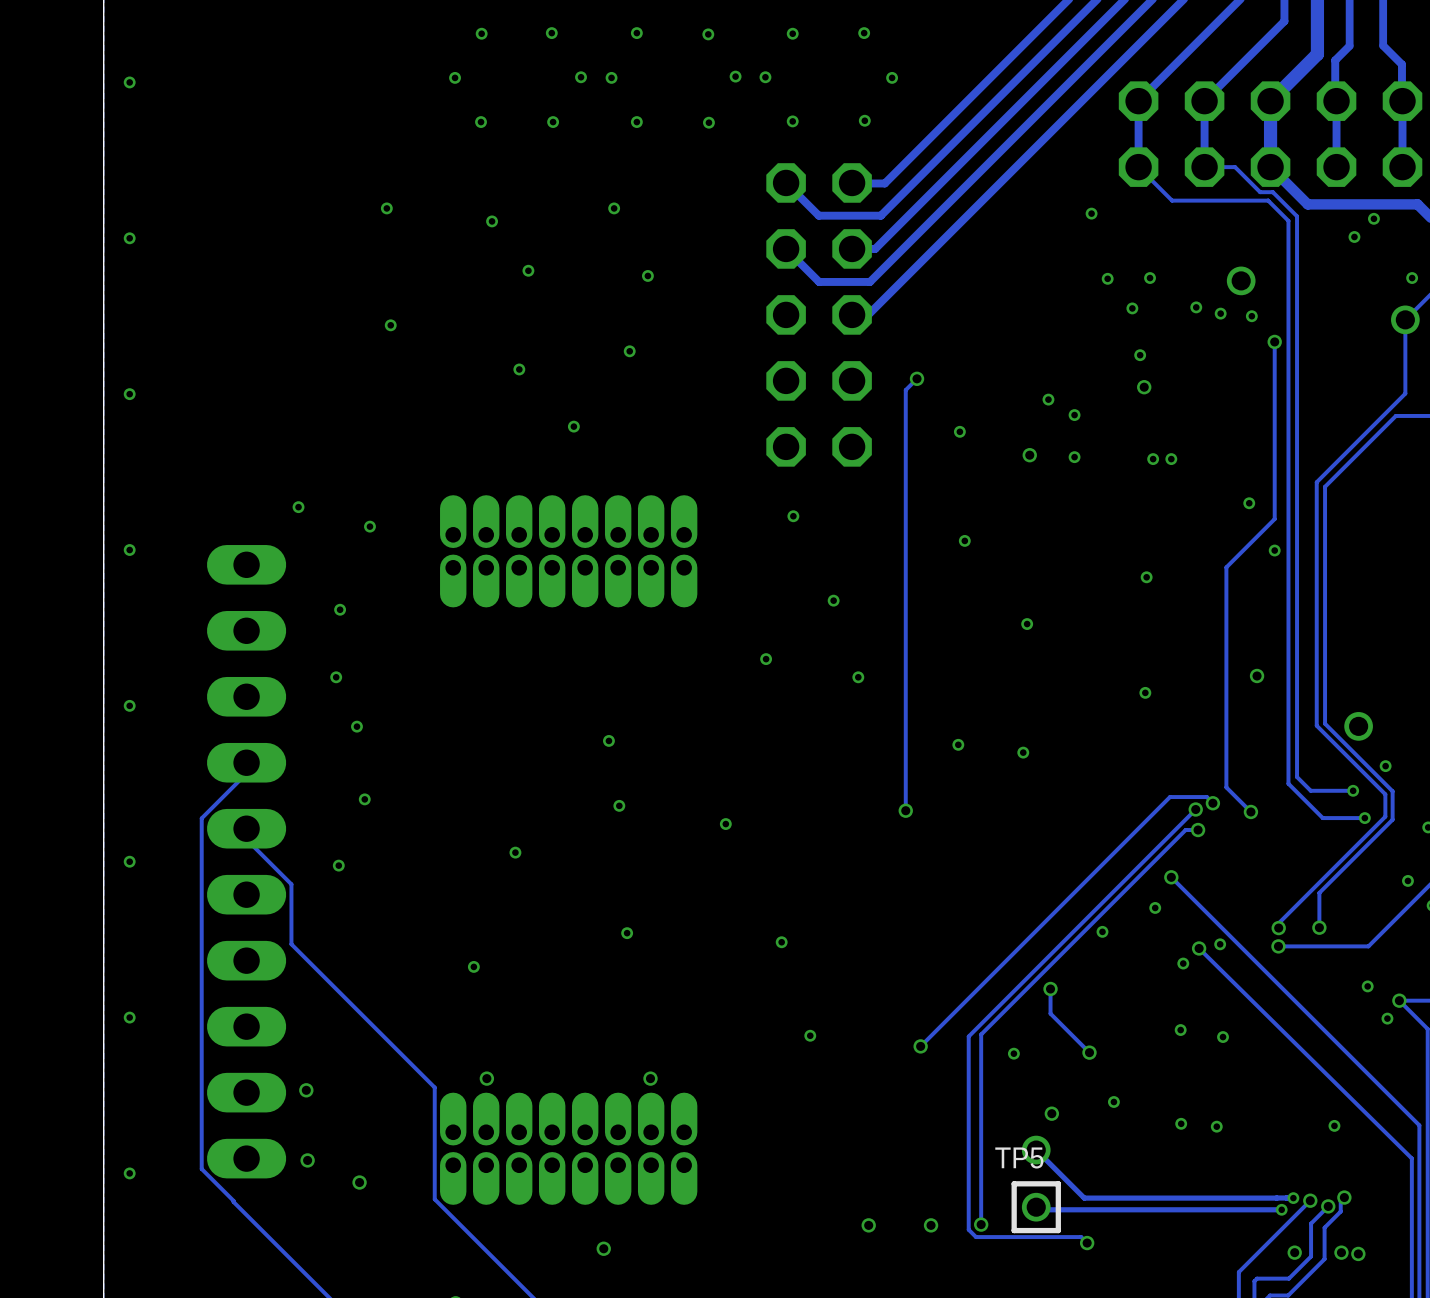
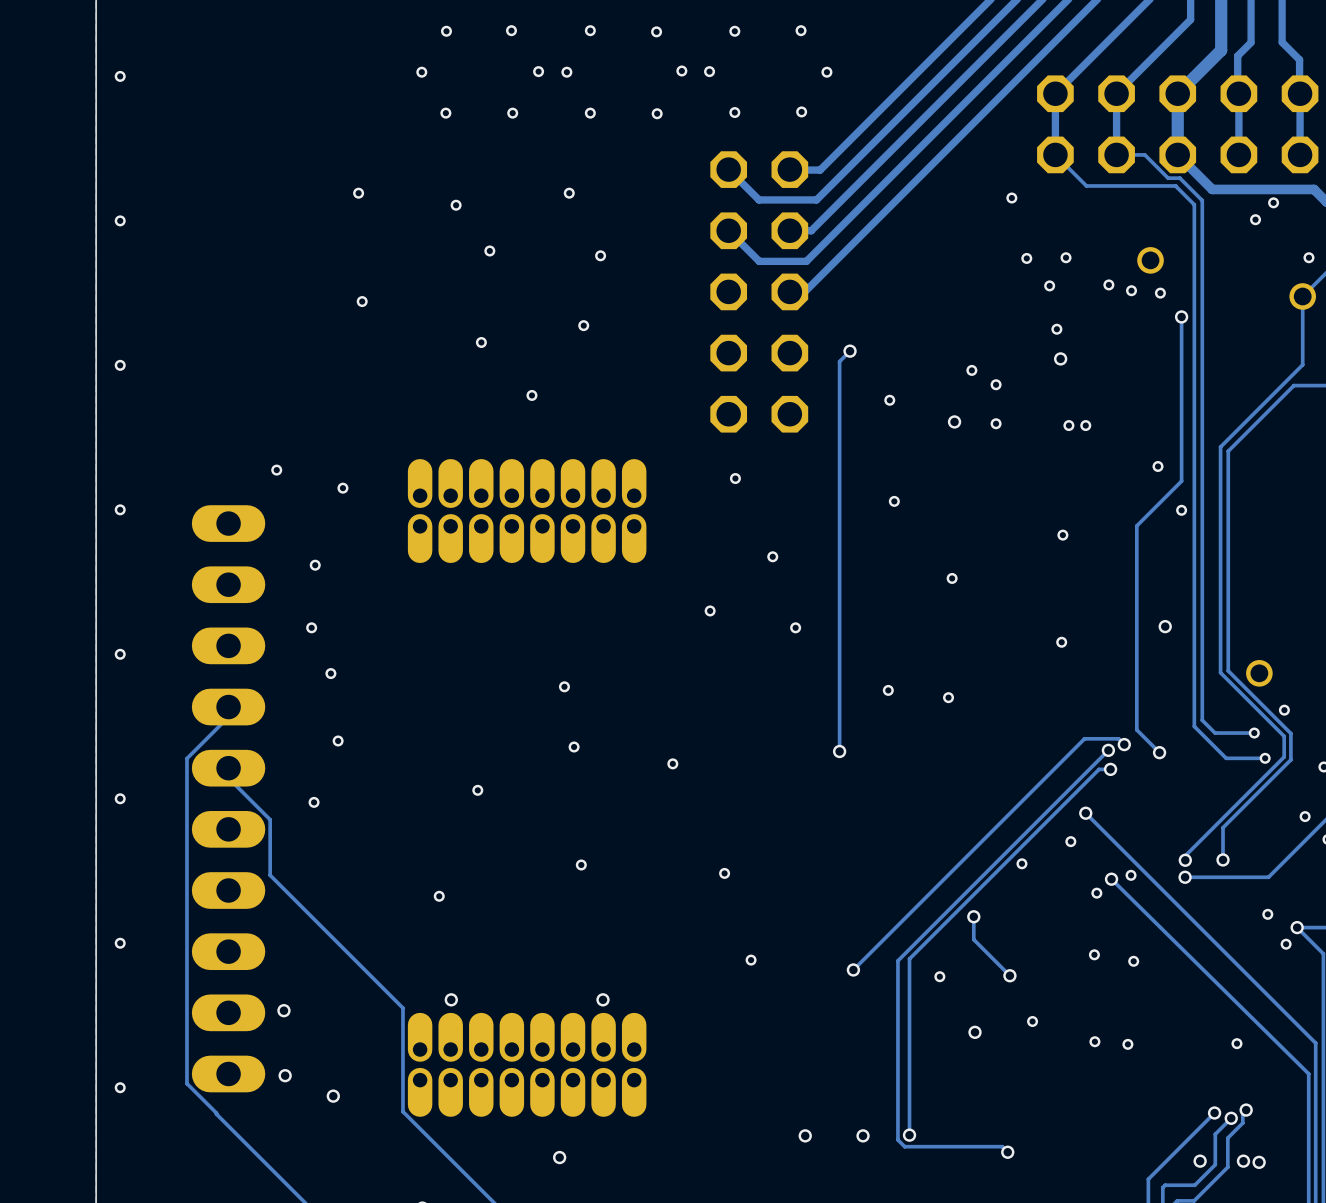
track: (1036, 1150) (1084, 1198) (1293, 1198) -> none
part: (1036, 1150) -> none
via: (1293, 1198) -> none
track: (1036, 1207) (1038, 1209) (1281, 1209) -> none
TP5: (1036, 1207) -> none
via: (1281, 1209) -> none

